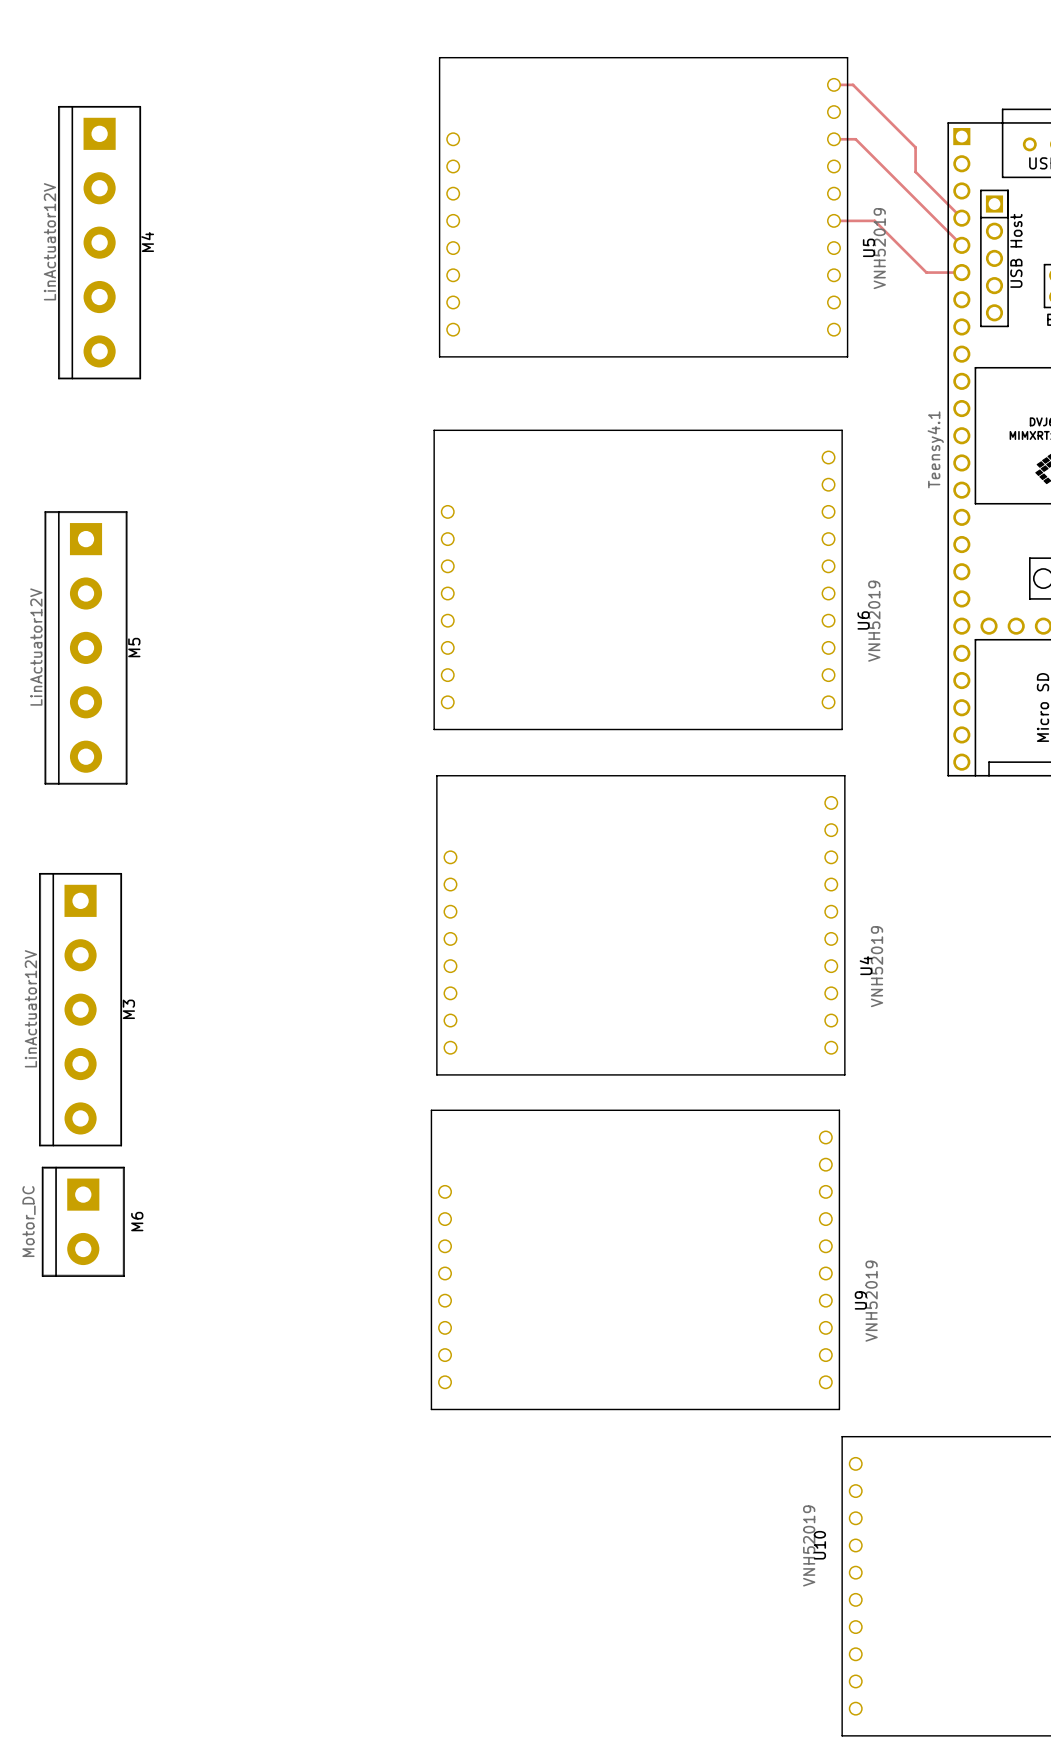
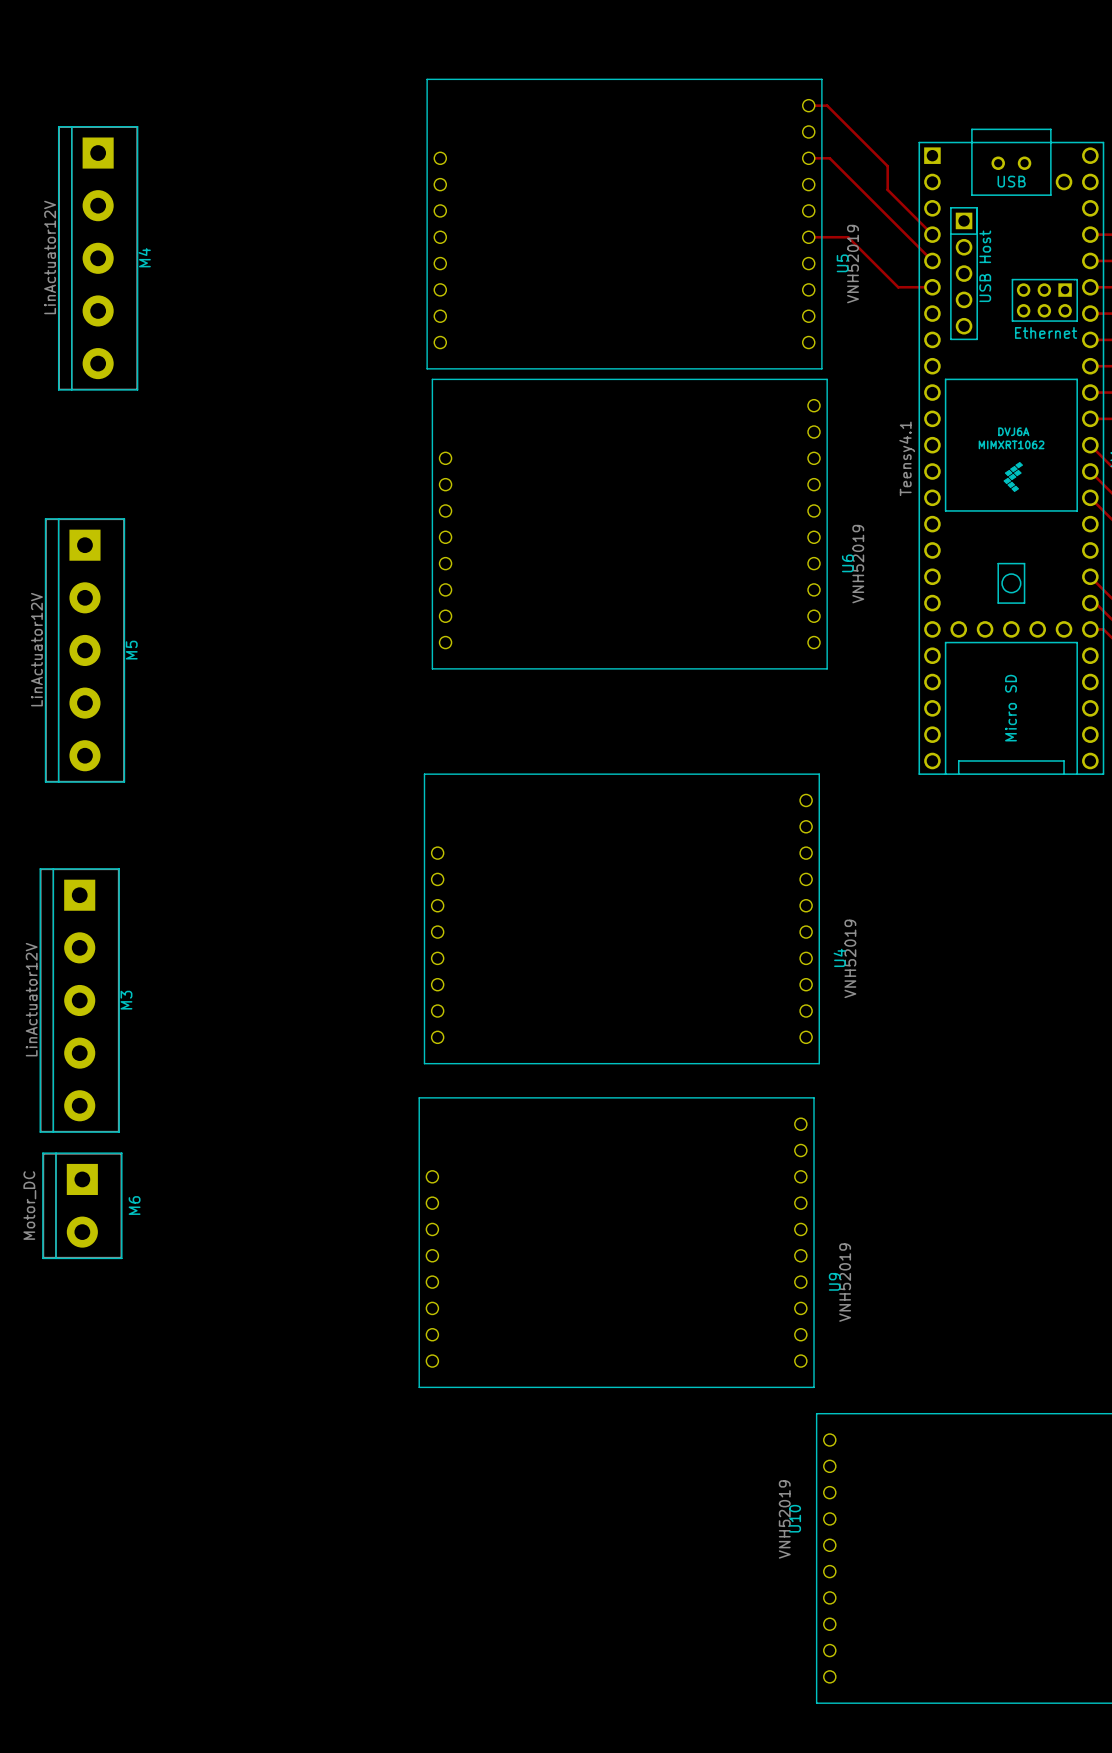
U6 position: (638, 579) -> (629, 524)

